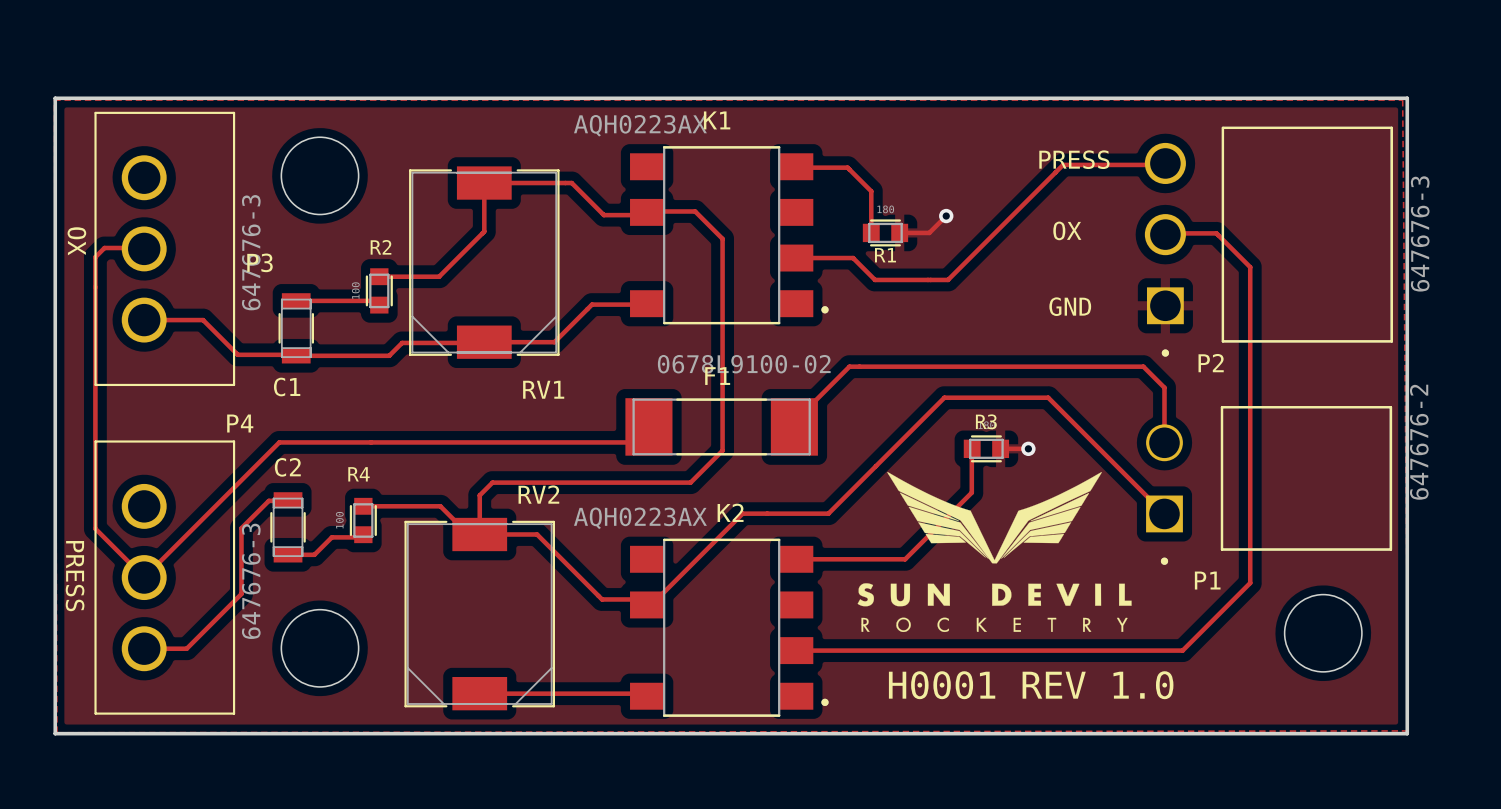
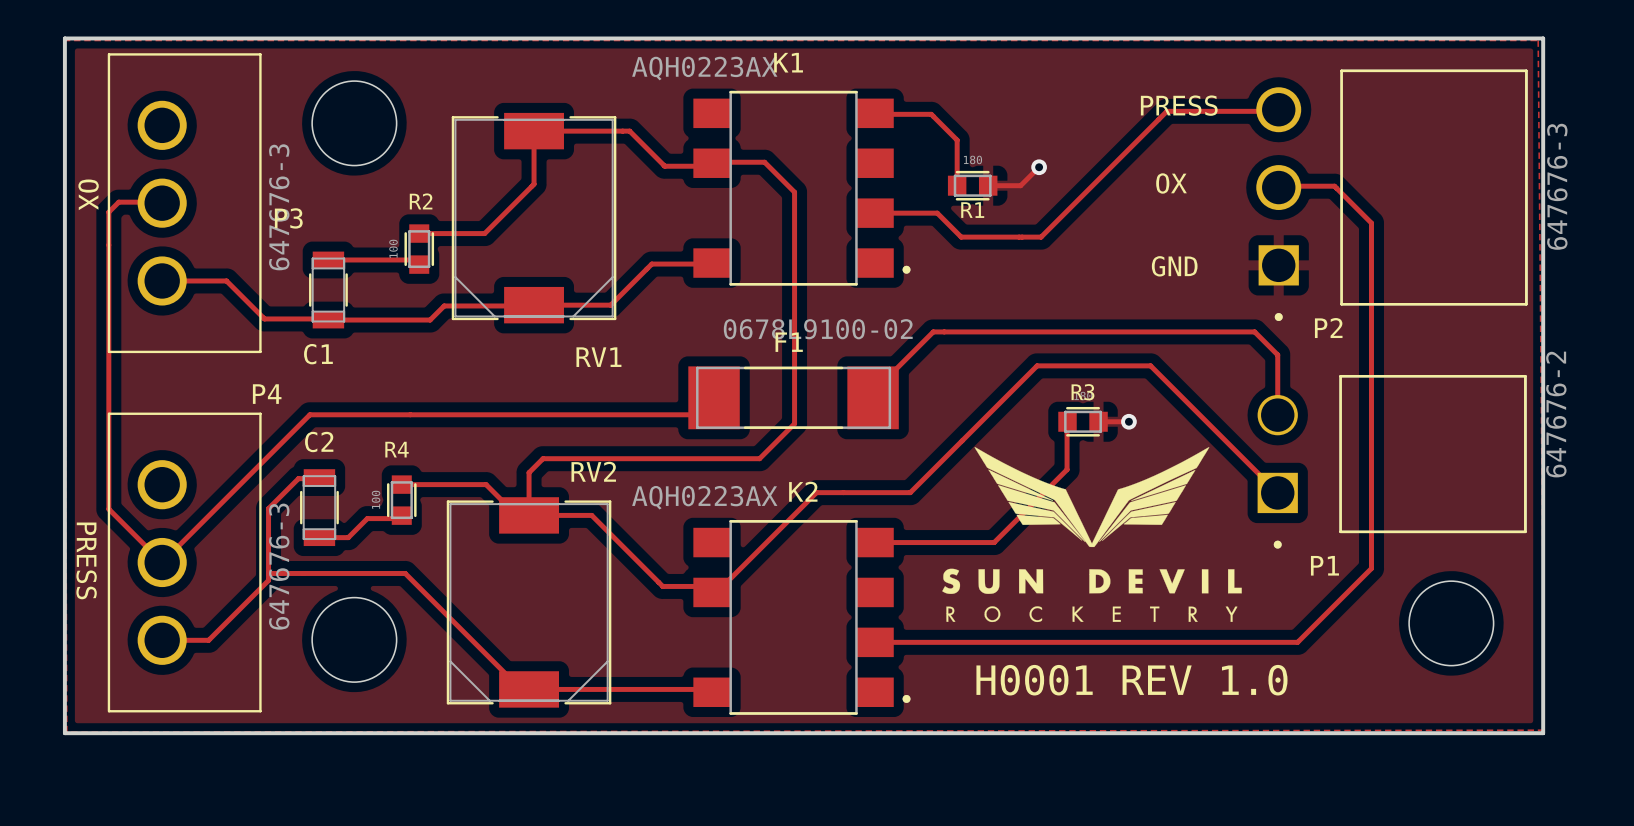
track: none -> (268, 573) (405, 573) (524, 692)

